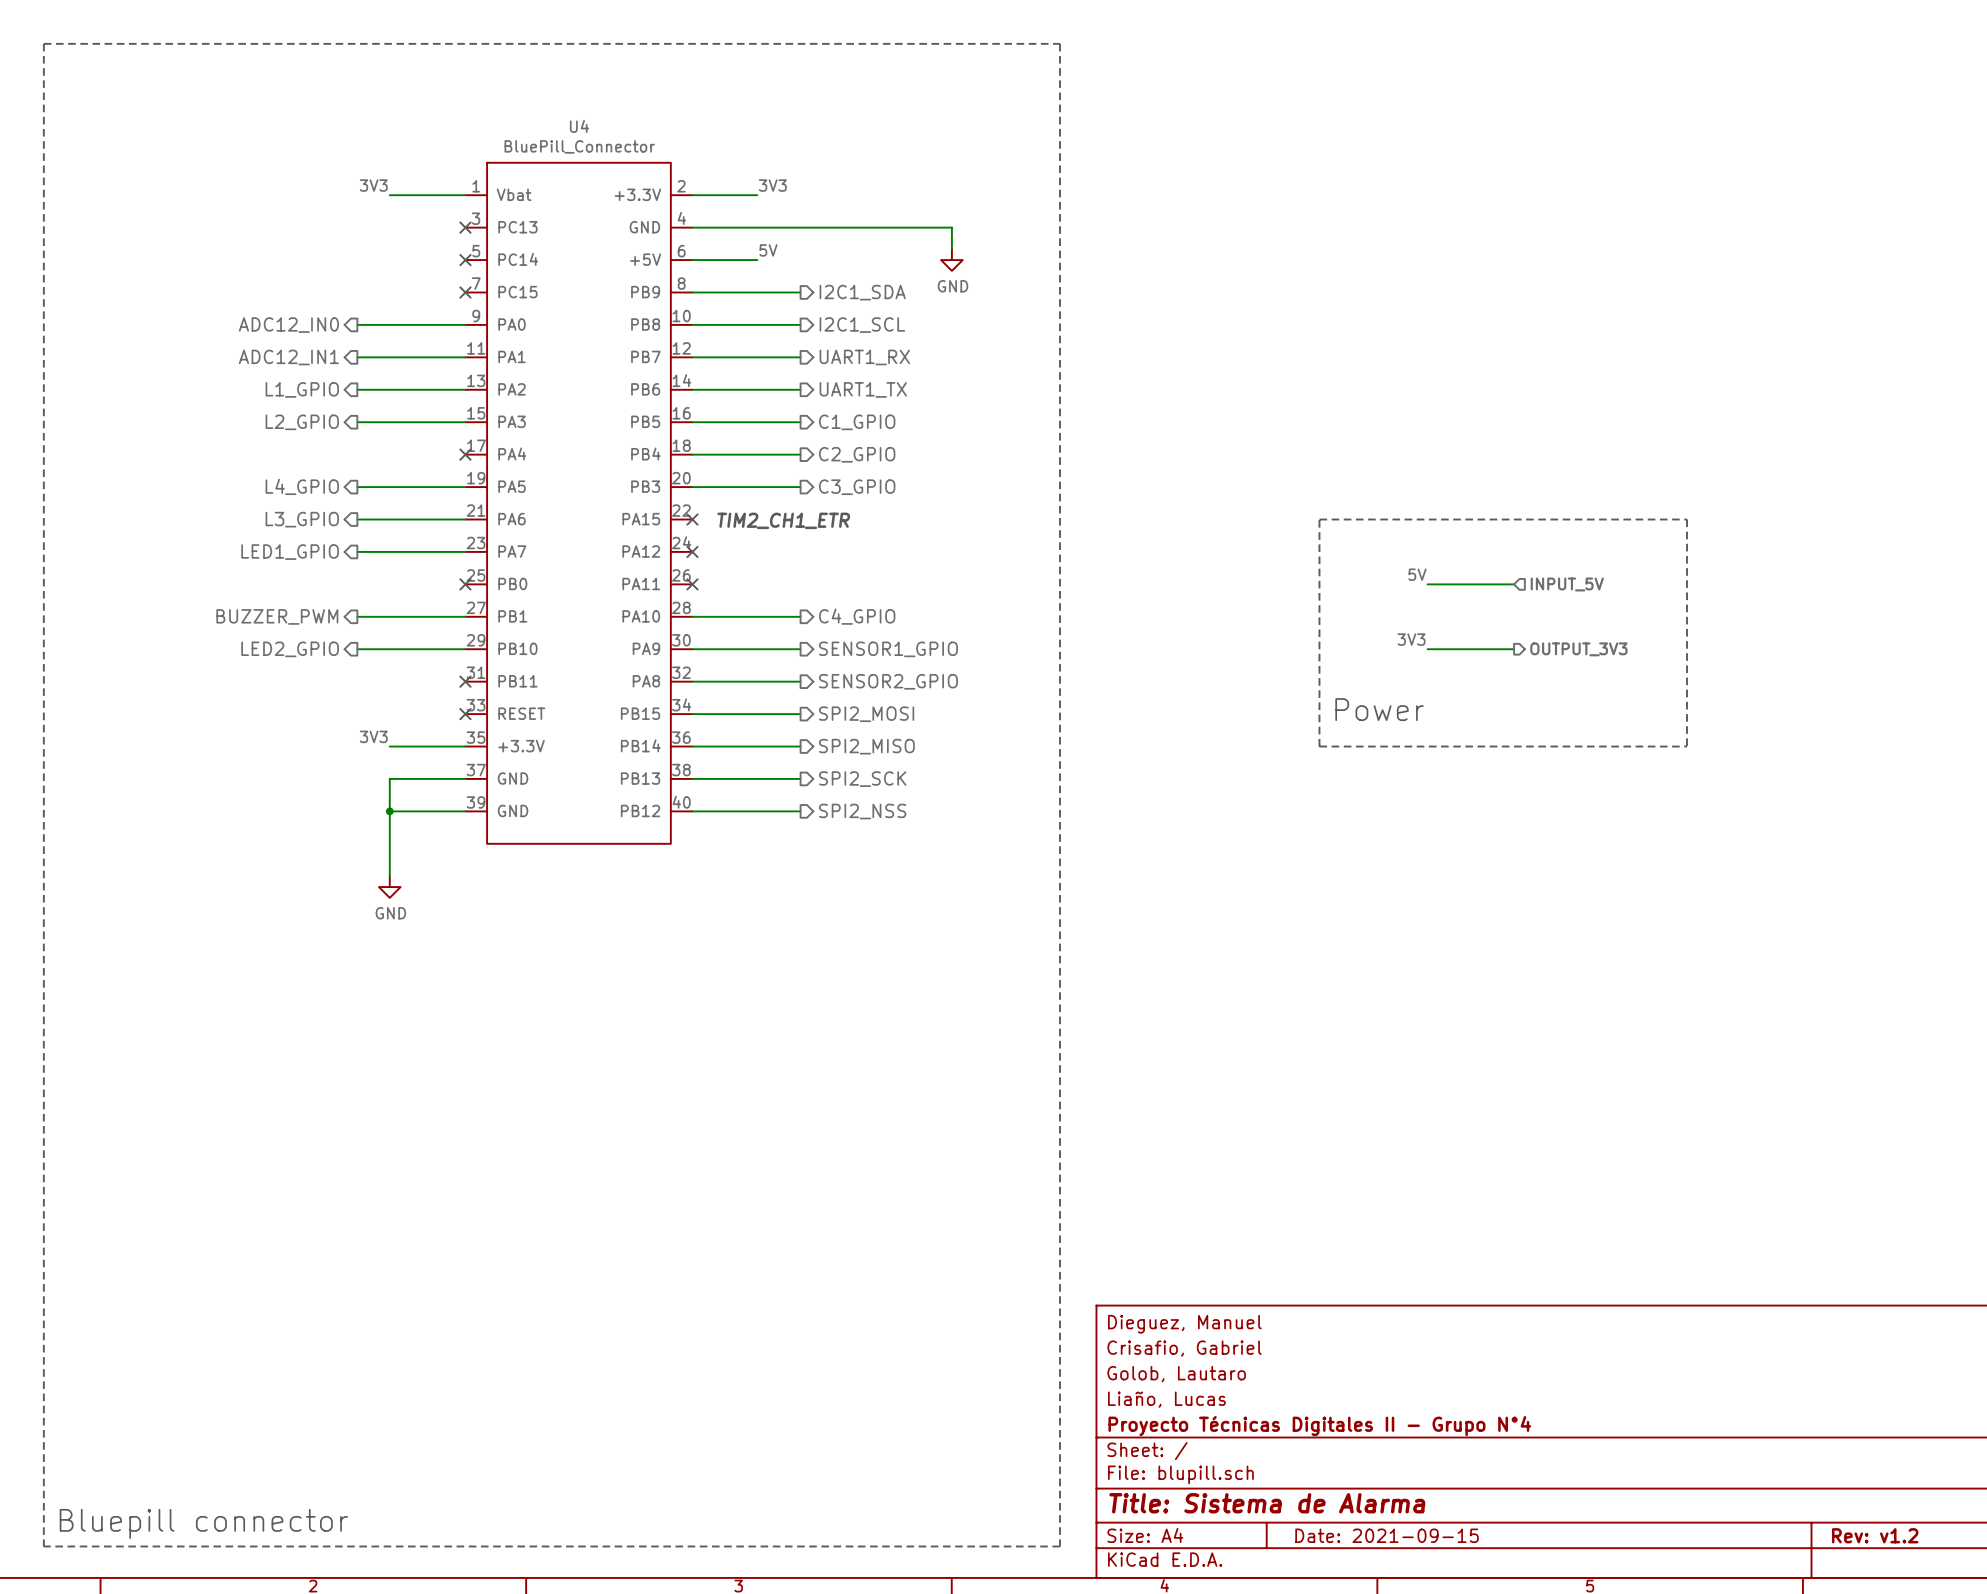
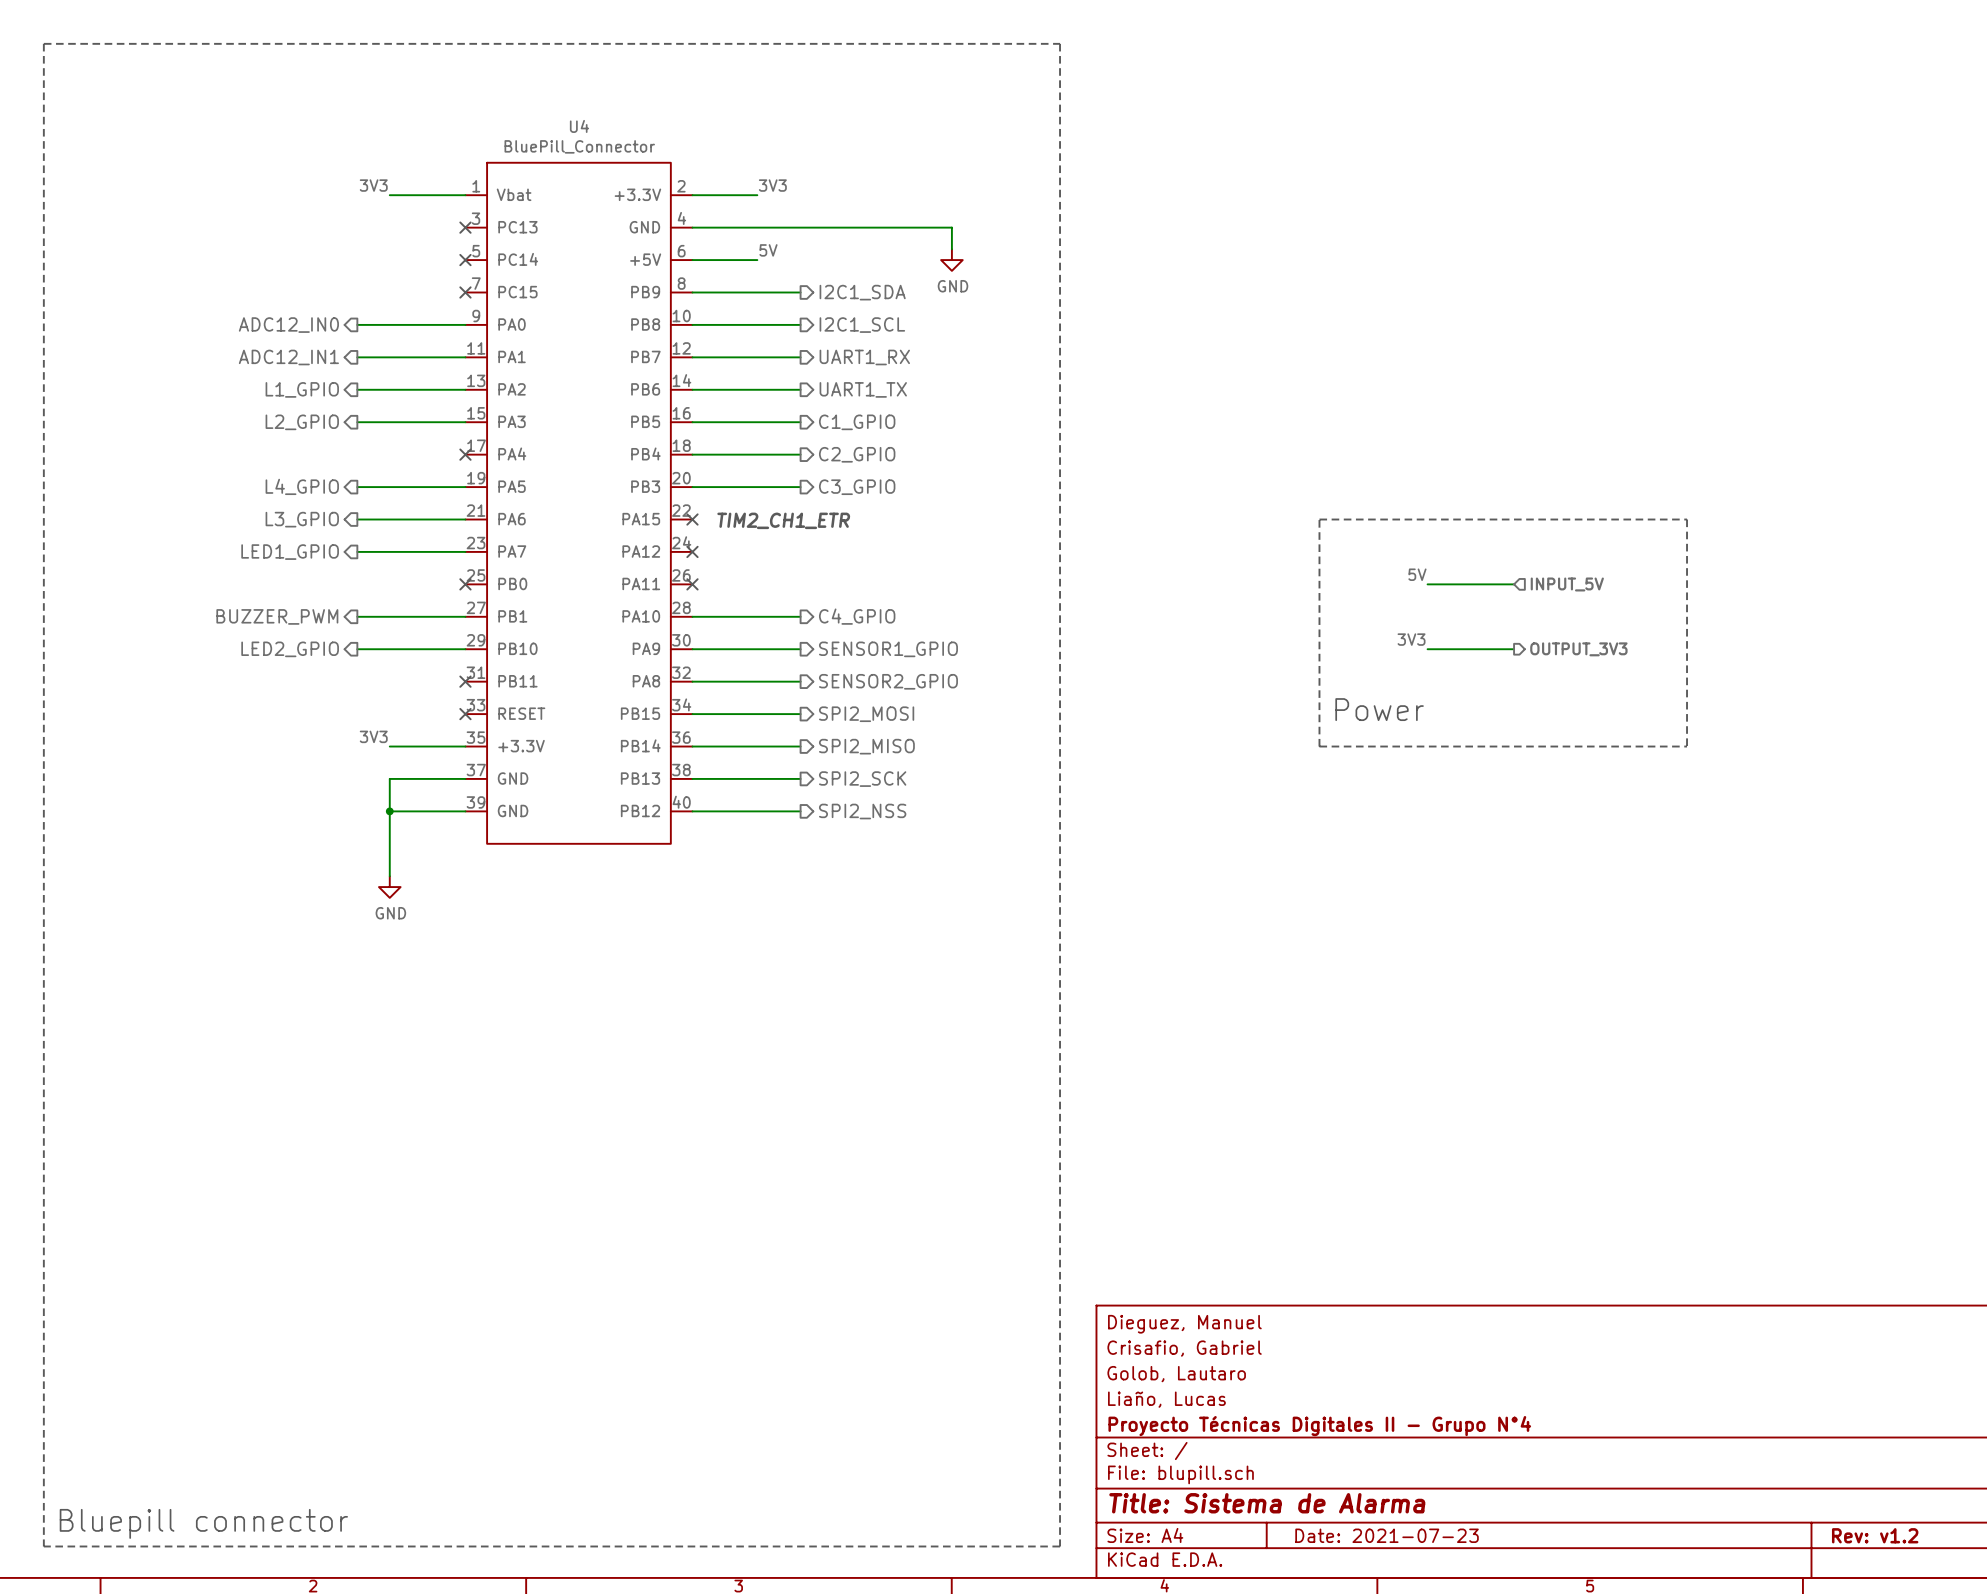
title block: Date: 2021-09-15 (1387, 1535) -> Date: 2021-07-23 (1387, 1535)

